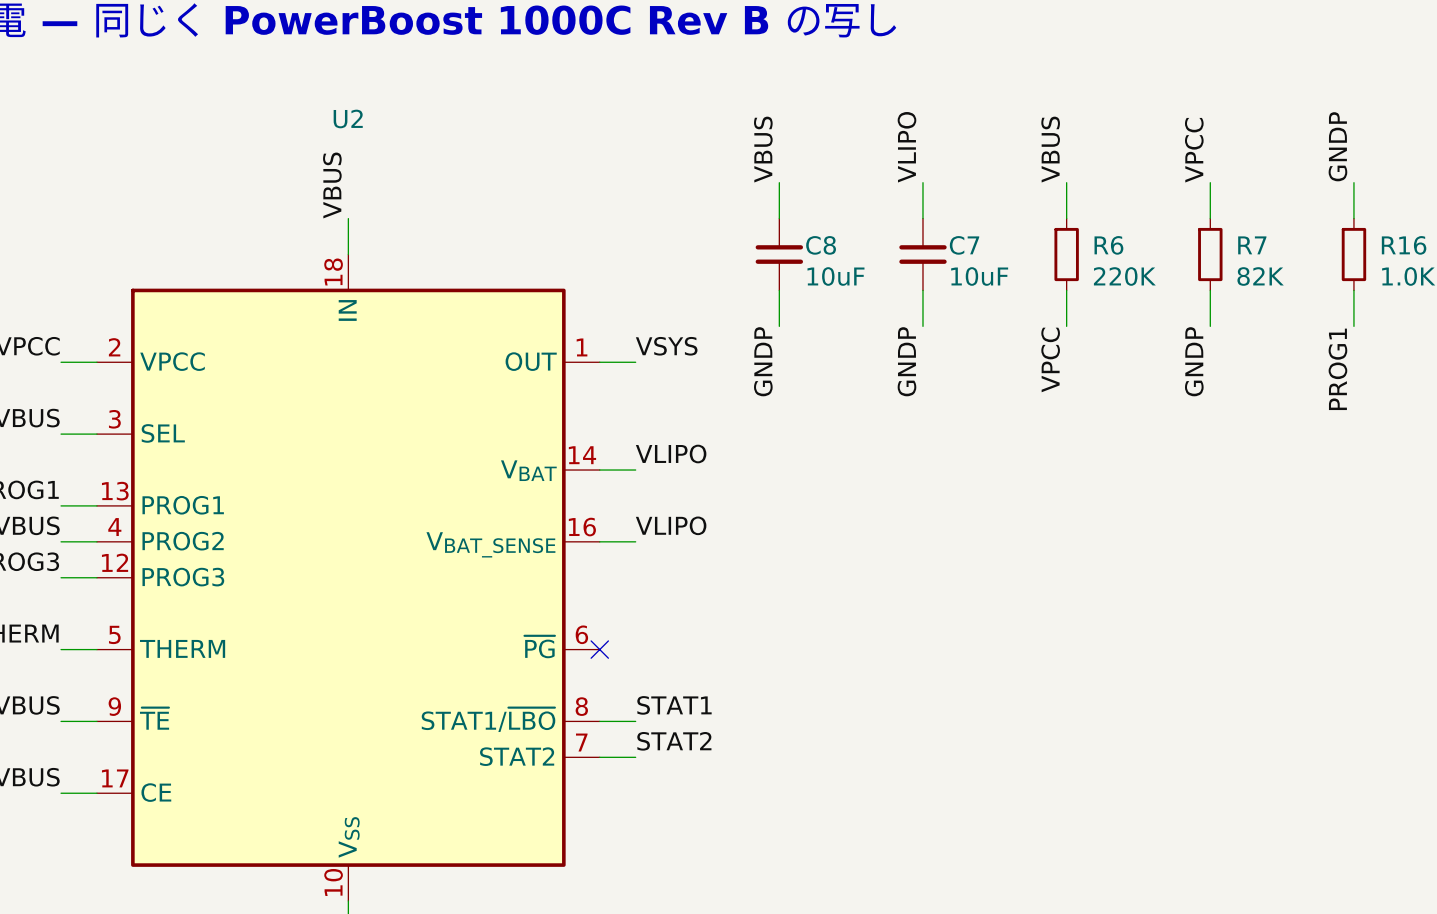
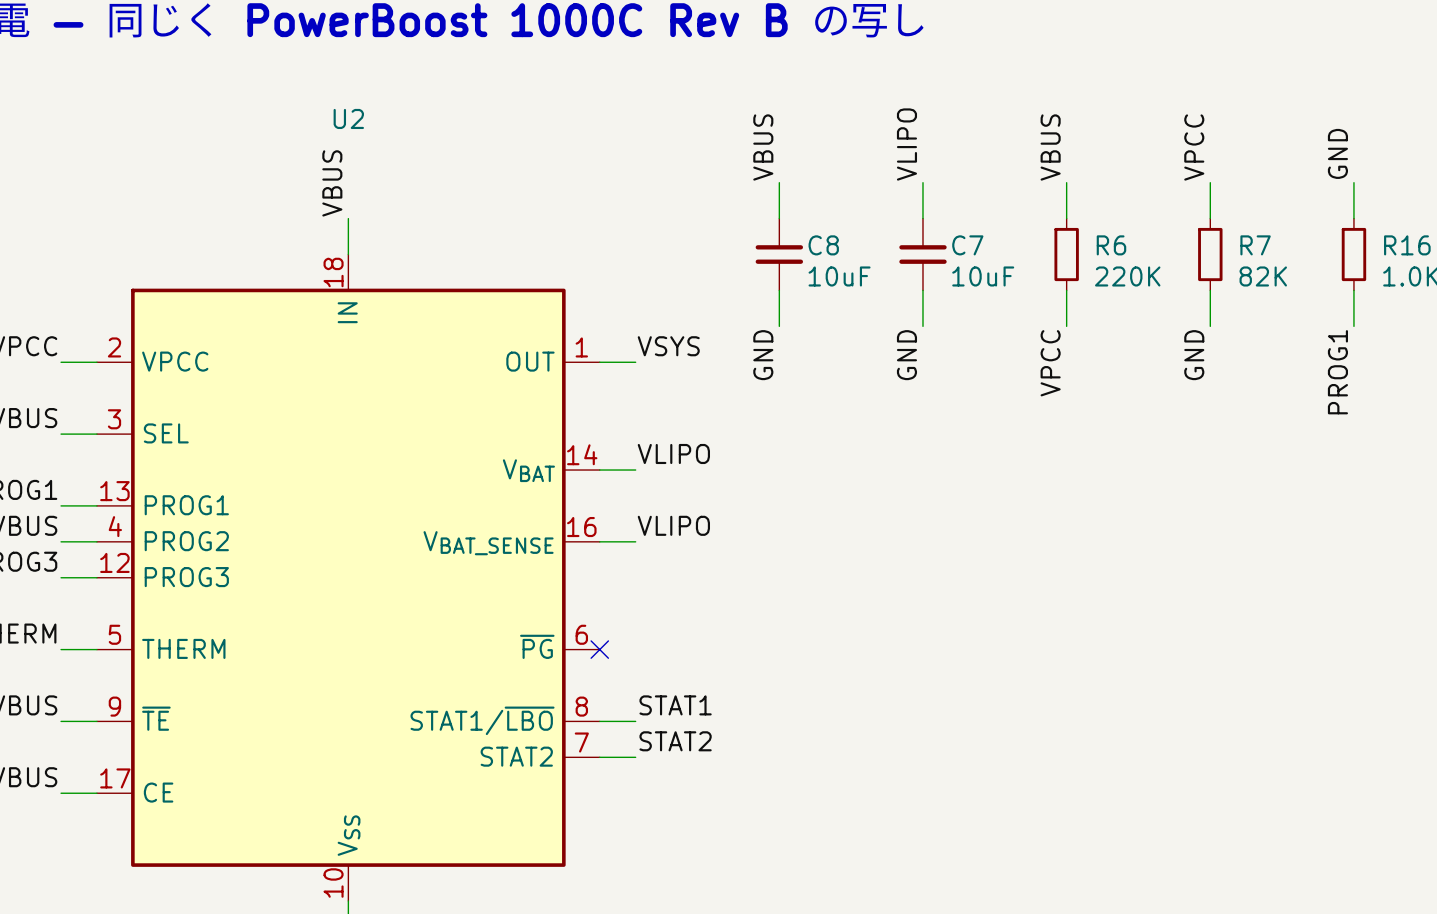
label: GNDP (1337, 146) -> GND (1337, 153)
label: GNDP (763, 361) -> GND (763, 355)
label: GNDP (906, 361) -> GND (906, 355)
label: GNDP (1194, 361) -> GND (1194, 355)

